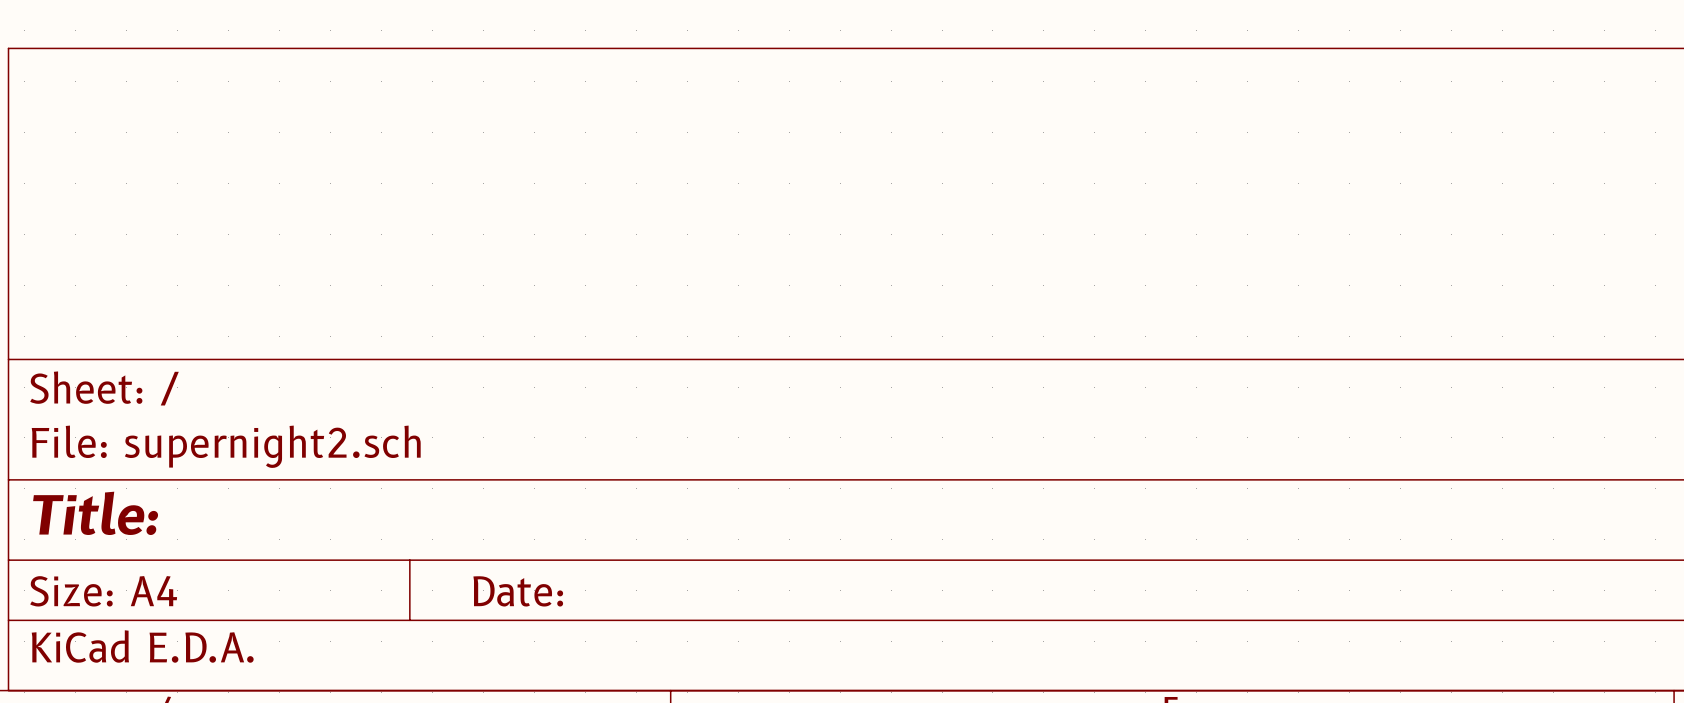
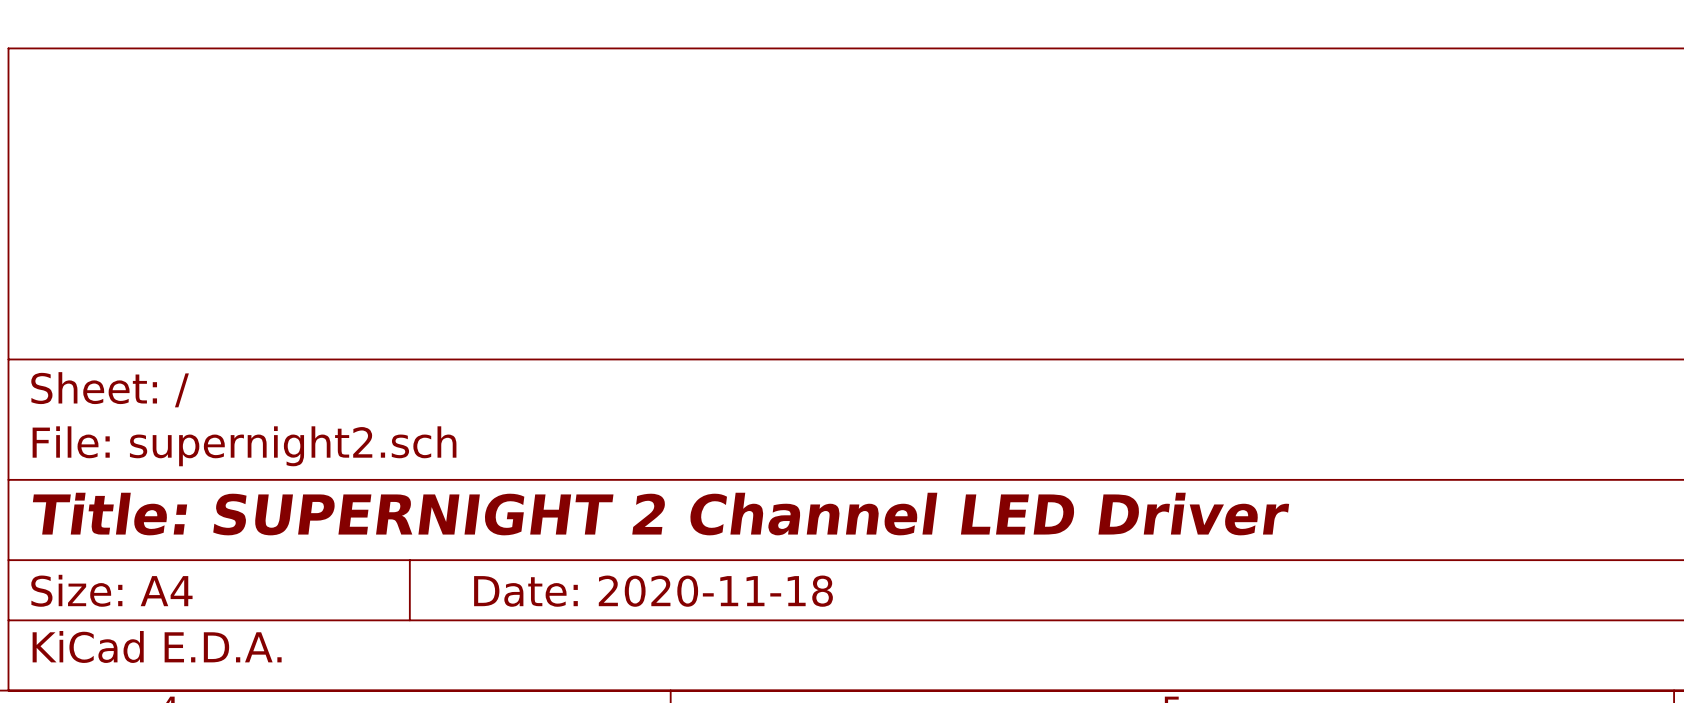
title block: Title: (95, 513) -> Title: SUPERNIGHT 2 Channel LED Driver (661, 514)
title block: Date: (518, 591) -> Date: 2020-11-18 (653, 591)

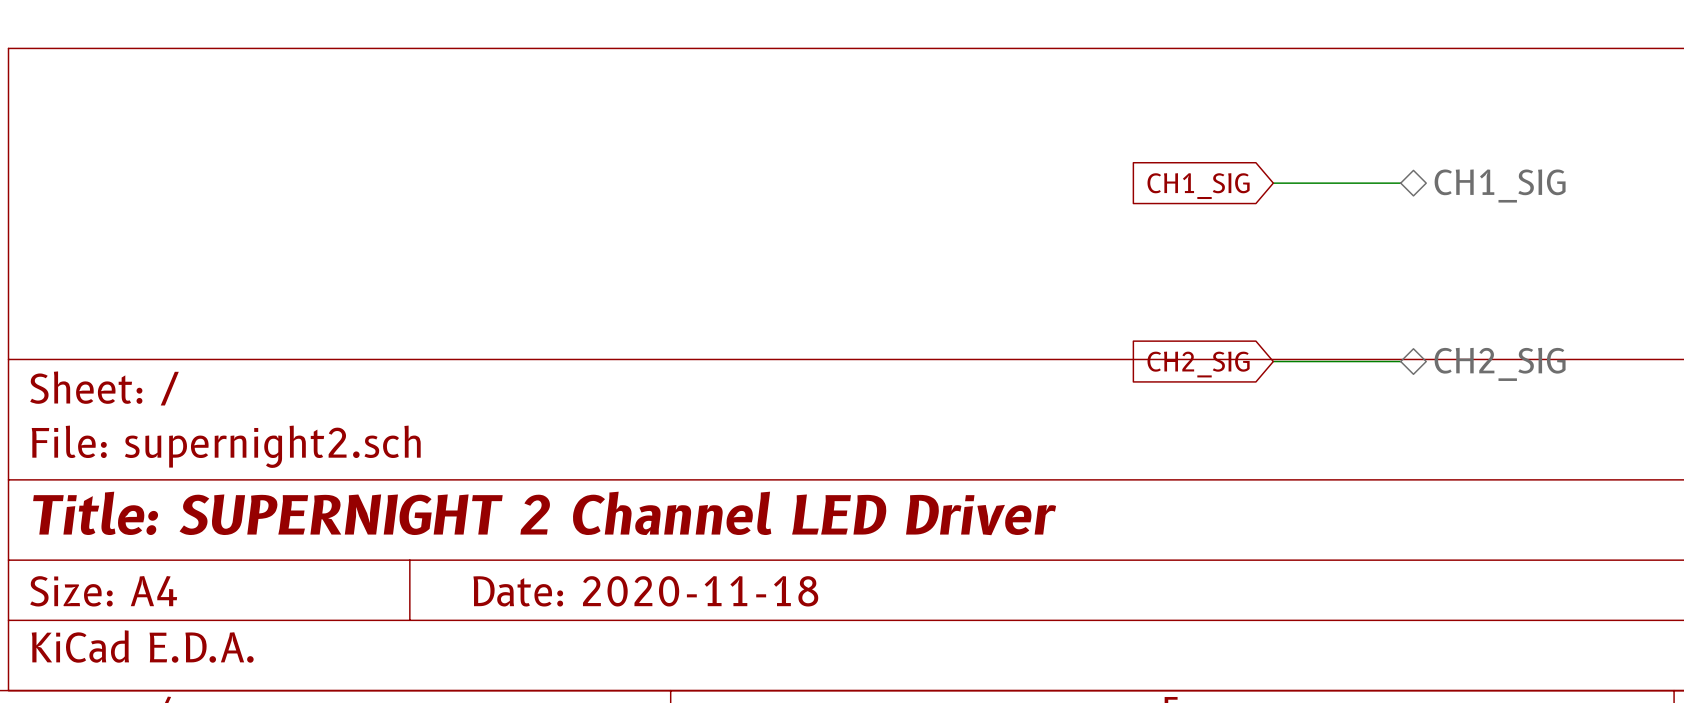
wire: none -> (1273, 183) (1400, 183)
global label: none -> CH1_SIG (1198, 186)
sheet pin: none -> CH1_SIG (1500, 186)
wire: none -> (1273, 361) (1400, 361)
global label: none -> CH2_SIG (1198, 364)
sheet pin: none -> CH2_SIG (1500, 364)

